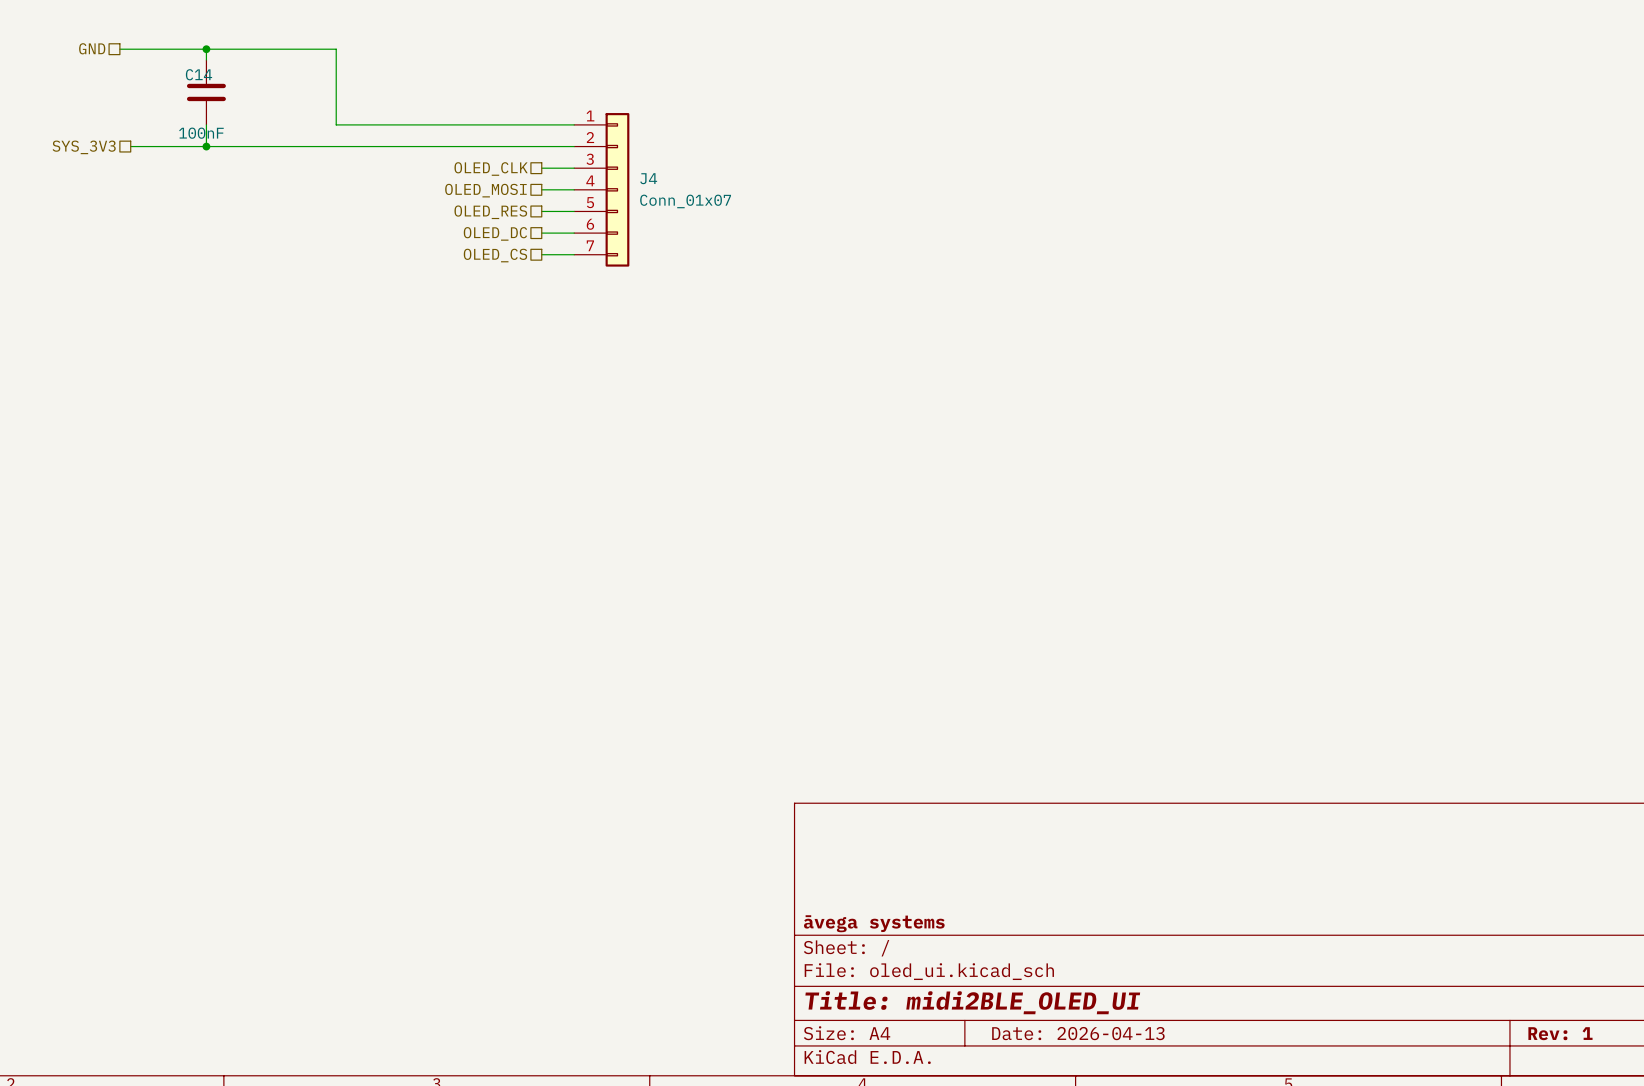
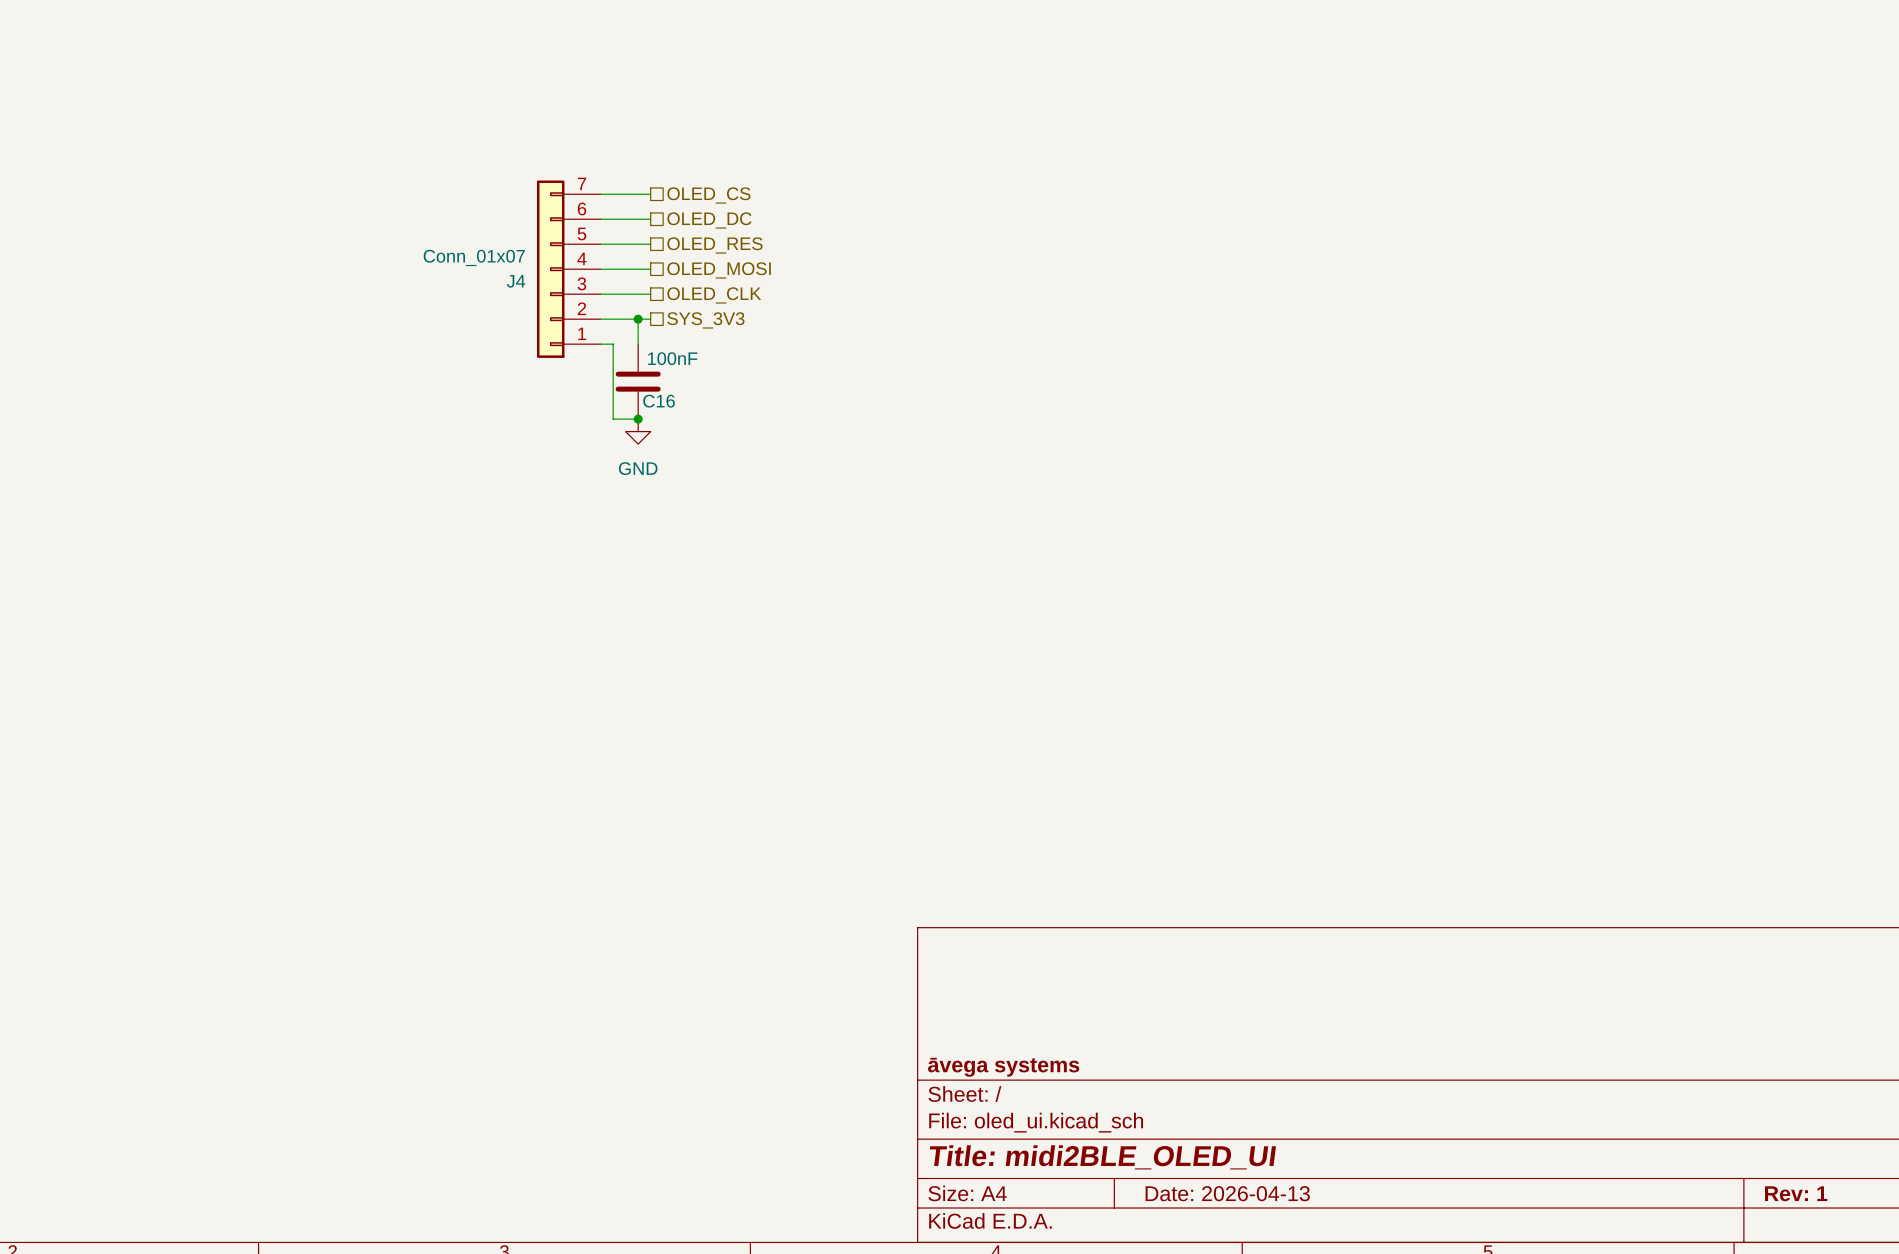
hierarchical label: GND (92, 48) -> none
wire: (119, 49) (336, 49) (336, 124) (574, 124) -> none
wire: (206, 49) (206, 60) -> none
junction: (206, 49) -> none
C14: 100nF (206, 92) -> none
wire: (206, 124) (206, 146) -> none
wire: (130, 146) (574, 146) -> none
junction: (206, 146) -> none
hierarchical label: SYS_3V3 (84, 147) -> none
wire: none -> (600, 194) (625, 194)
wire: (563, 168) (574, 168) -> none
hierarchical label rotation: 0° (491, 169) -> 180° (714, 295)
hierarchical label position: OLED_CLK (491, 169) -> OLED_CLK (714, 295)
wire: none -> (600, 219) (625, 219)
wire: (563, 189) (574, 189) -> none
J4 position: (601, 189) -> (568, 269)
J4 rotation: 0° (617, 189) -> 180° (550, 269)
hierarchical label rotation: 0° (485, 190) -> 180° (719, 270)
hierarchical label position: OLED_MOSI (485, 190) -> OLED_MOSI (719, 270)
wire: none -> (600, 244) (625, 244)
wire: (563, 211) (574, 211) -> none
hierarchical label rotation: 0° (490, 212) -> 180° (714, 245)
hierarchical label position: OLED_RES (490, 212) -> OLED_RES (714, 245)
hierarchical label rotation: 0° (495, 233) -> 180° (709, 220)
hierarchical label position: OLED_DC (495, 233) -> OLED_DC (709, 220)
wire: none -> (600, 269) (625, 269)
wire: (563, 233) (574, 233) -> none
wire: none -> (600, 294) (625, 294)
wire: (563, 254) (574, 254) -> none
hierarchical label rotation: 0° (495, 255) -> 180° (708, 195)
hierarchical label position: OLED_CS (495, 255) -> OLED_CS (708, 195)
wire: none -> (600, 319) (650, 319)
wire: none -> (638, 319) (638, 344)
junction: none -> (638, 319)
hierarchical label: none -> SYS_3V3 (705, 320)
wire: none -> (600, 344) (613, 344) (613, 419) (638, 419)
C16: none -> 100nF (638, 381)
junction: none -> (638, 419)
power symbol: none -> GND (638, 431)

